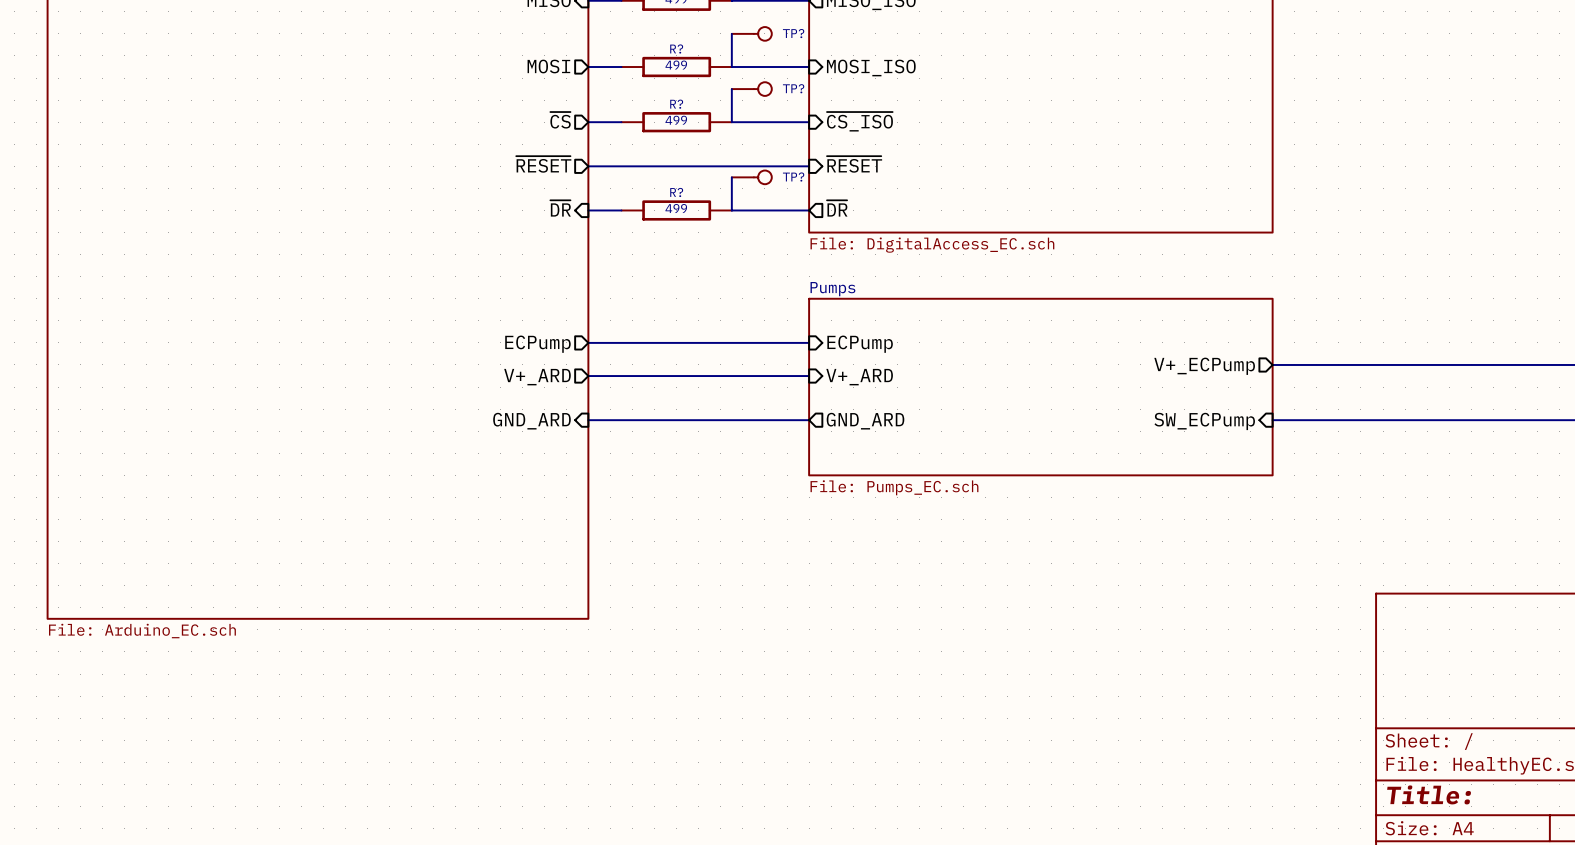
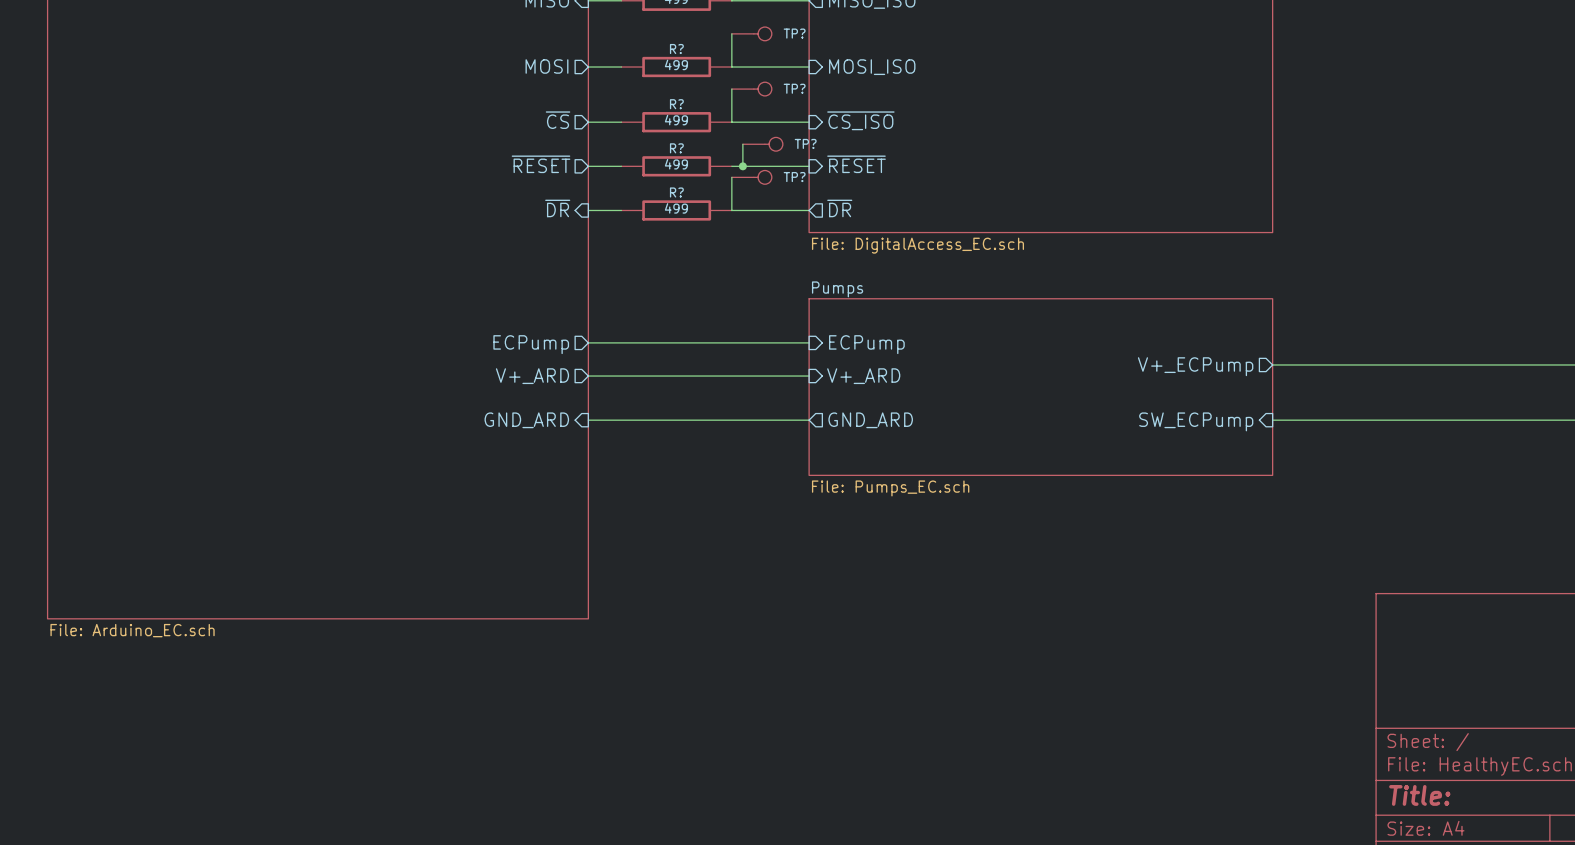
wire: none -> (742, 144) (742, 166)
TP?: none -> (762, 144)
wire: (621, 166) (731, 166) -> none
R?: none -> 499 (676, 166)
junction: none -> (742, 166)

